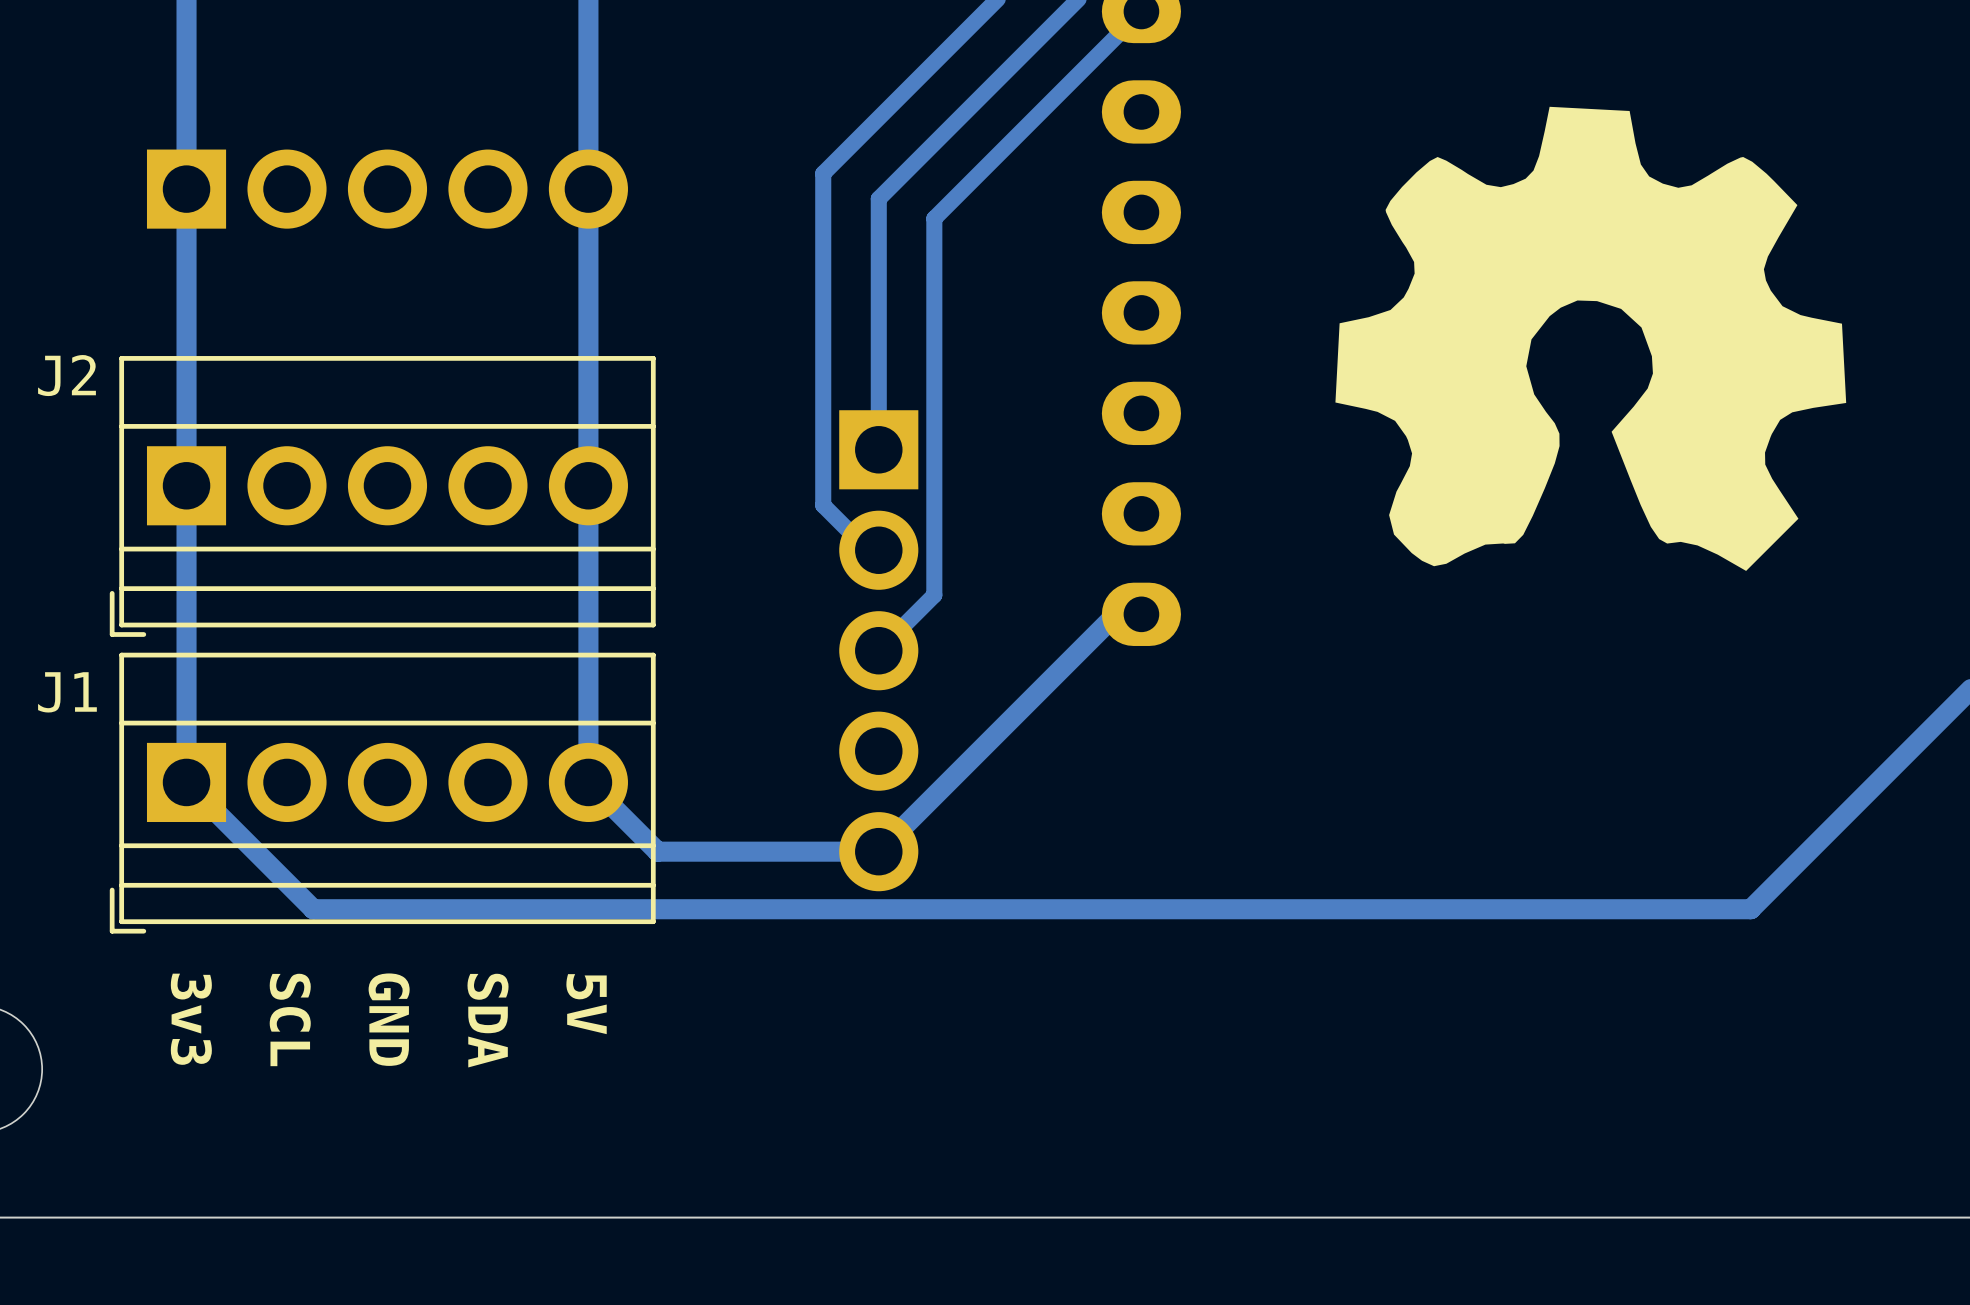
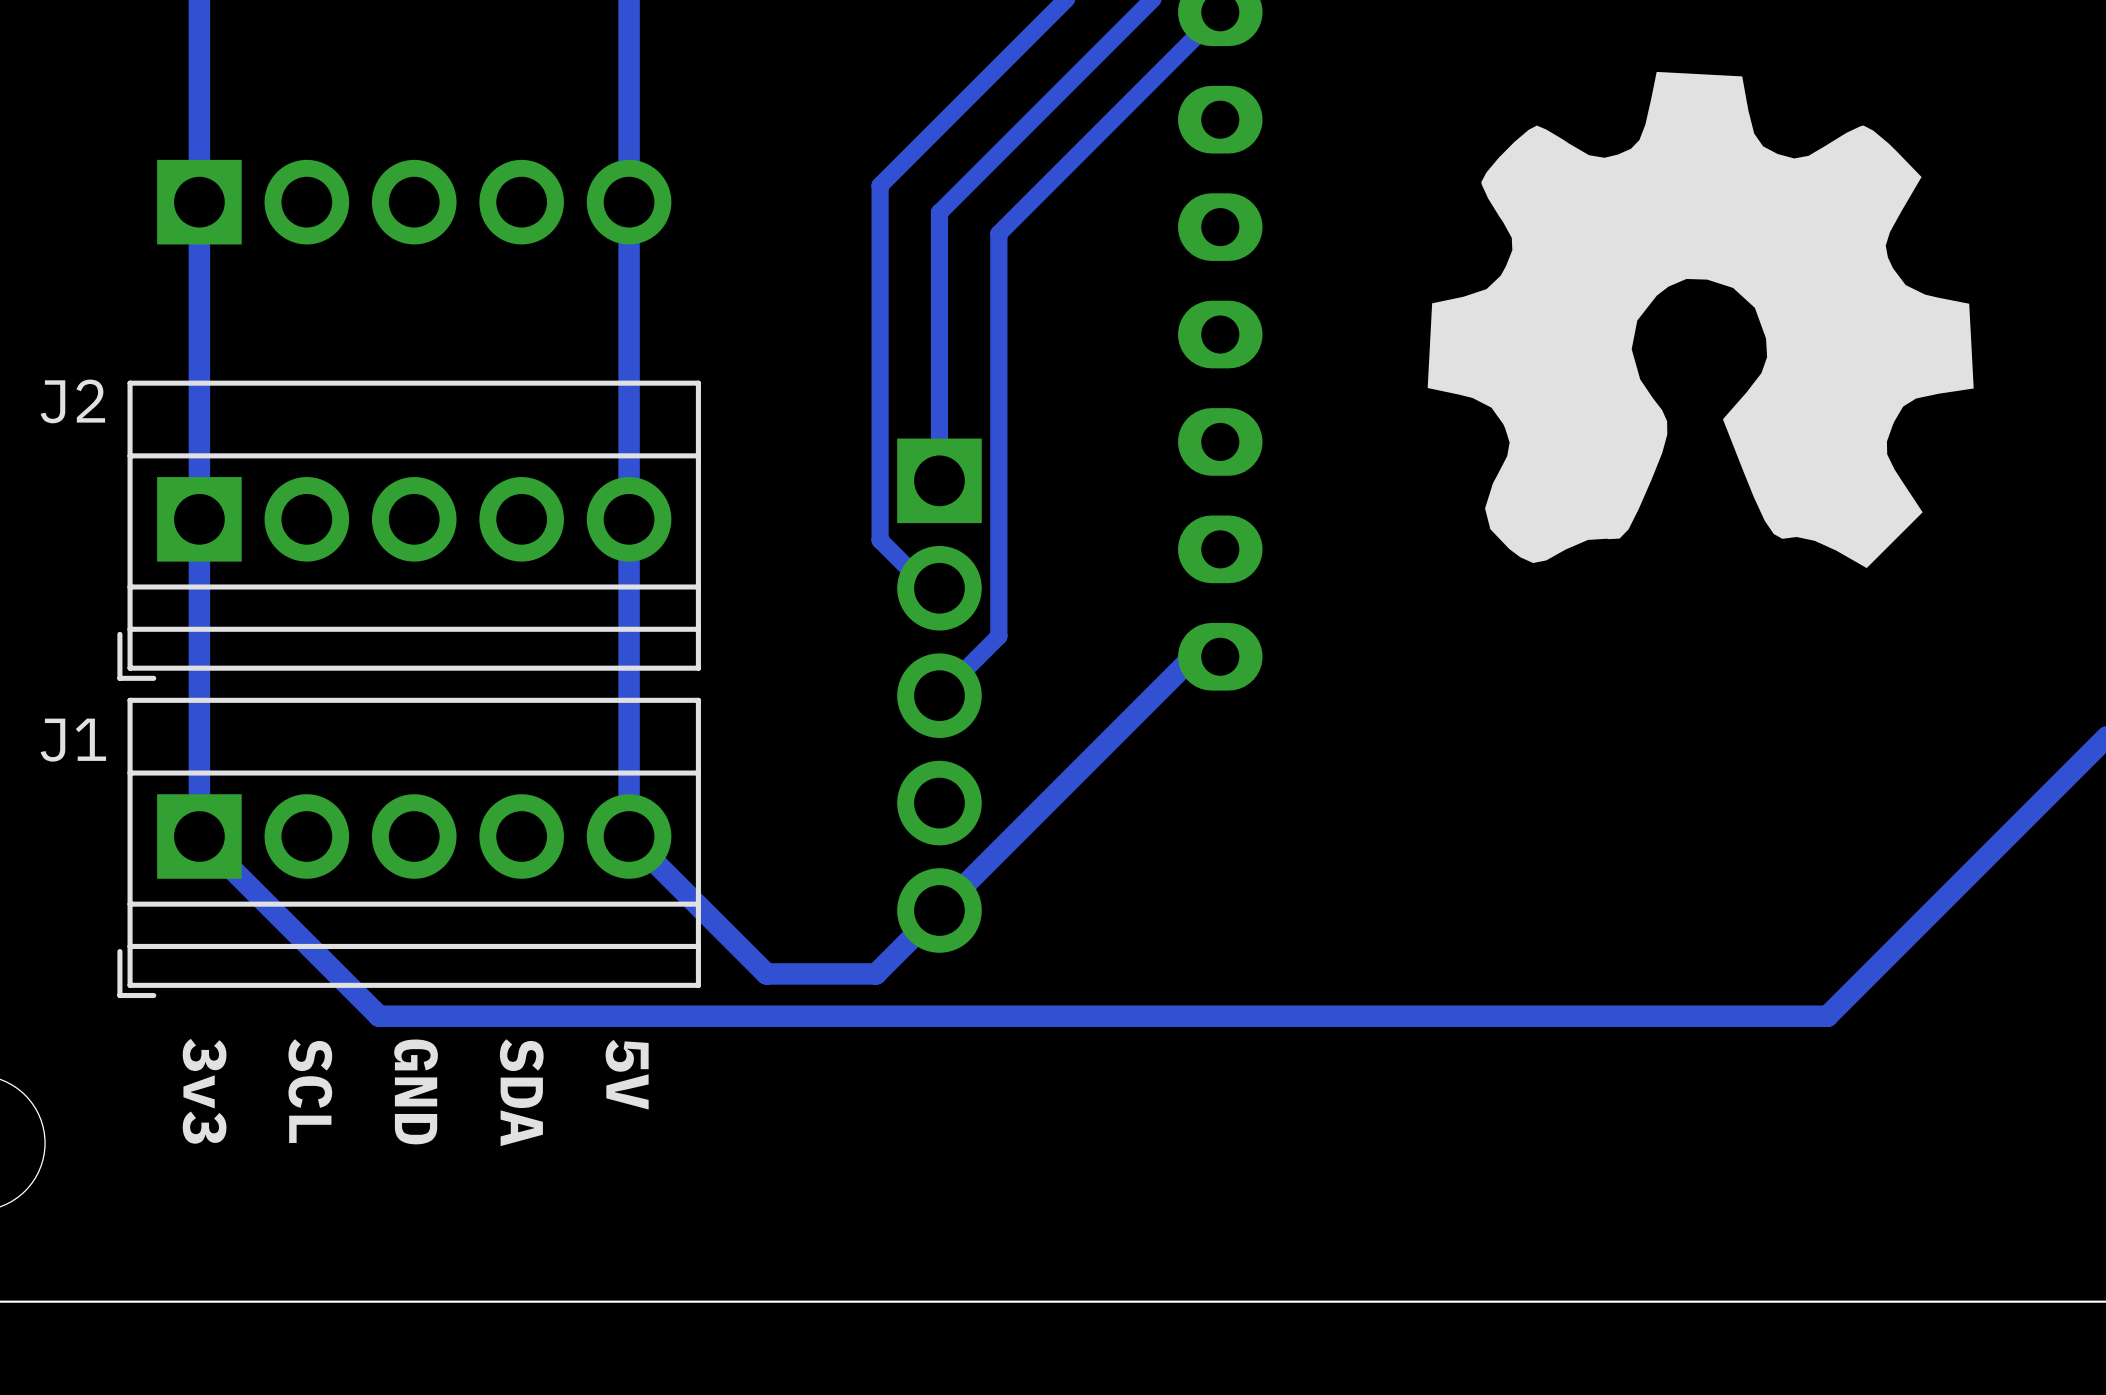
drawing position: (1590, 338) -> (1700, 319)
track: (878, 851) (657, 851) -> (939, 910) (876, 973) (766, 973) (703, 910)
track: (1750, 909) (313, 909) -> (1871, 972) (1827, 1016) (379, 1016) (334, 972)

